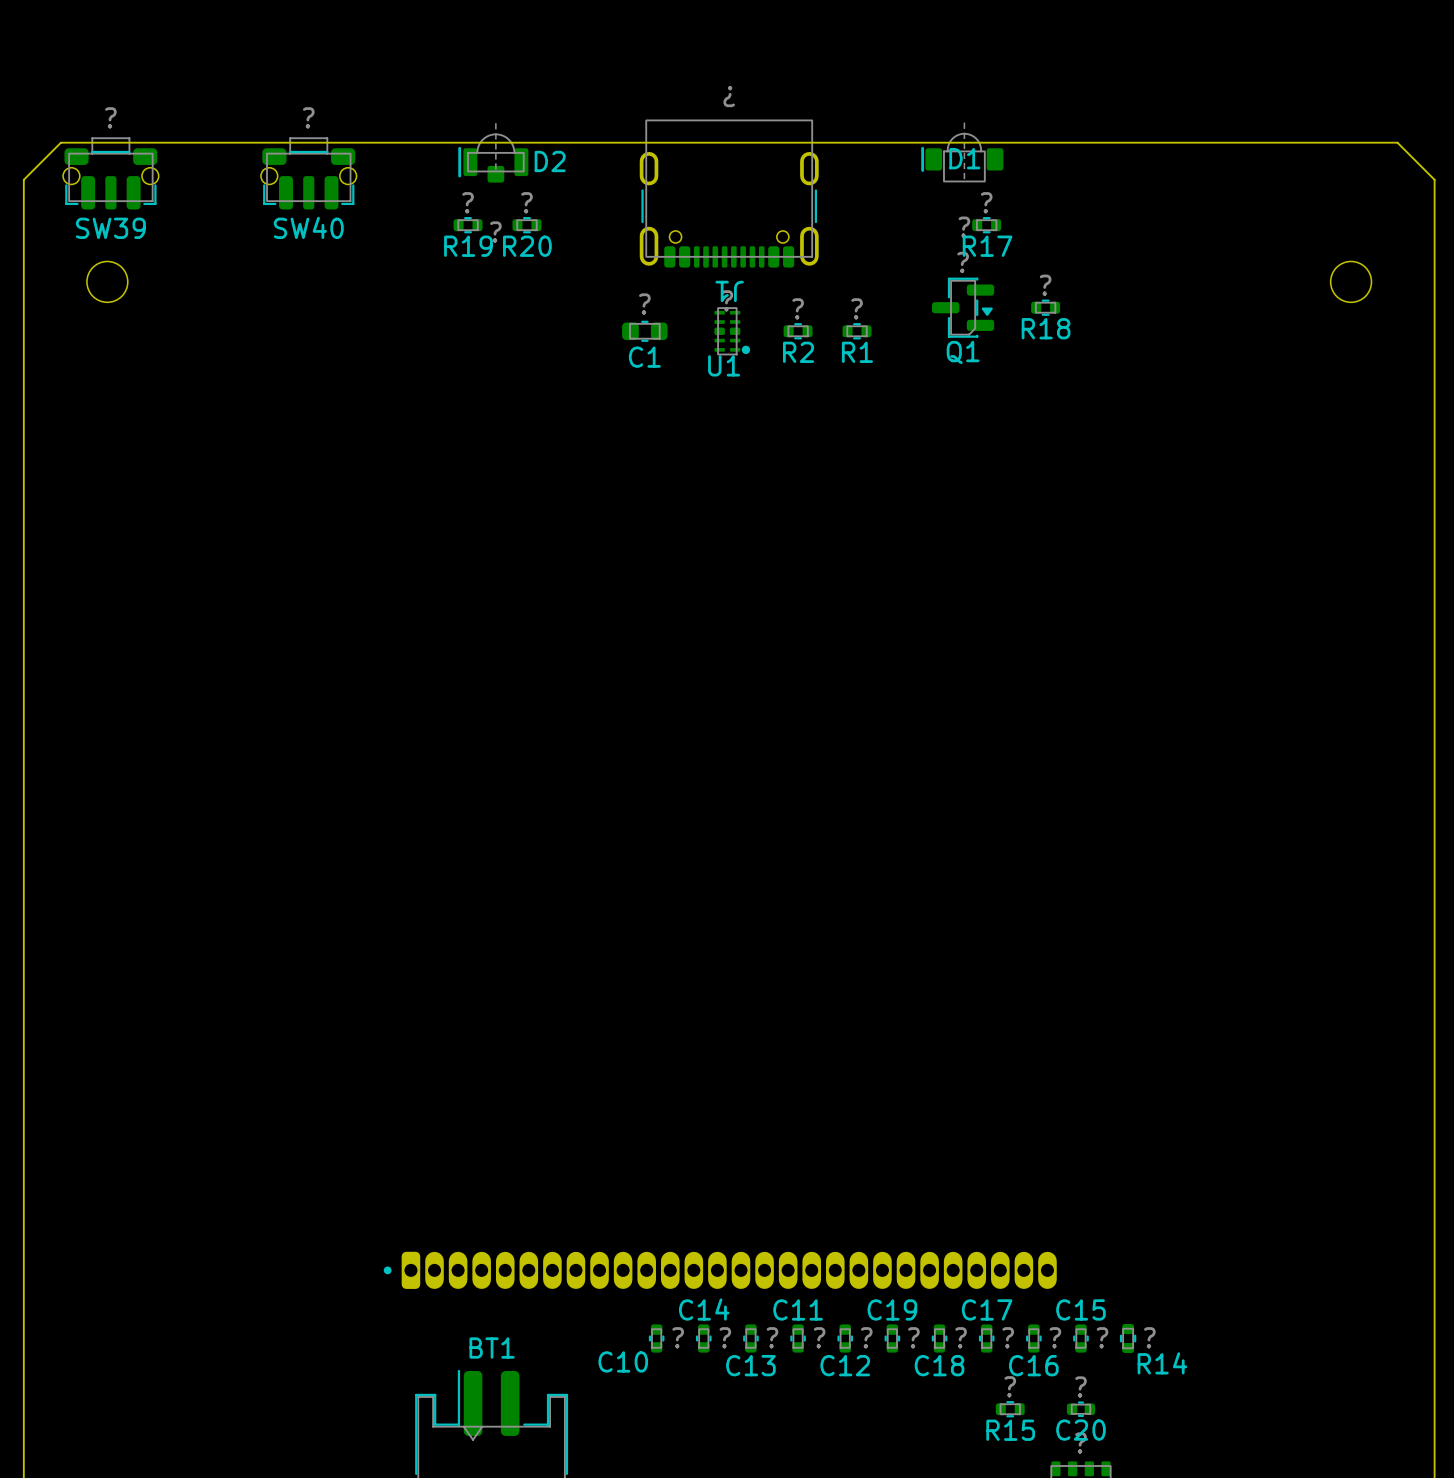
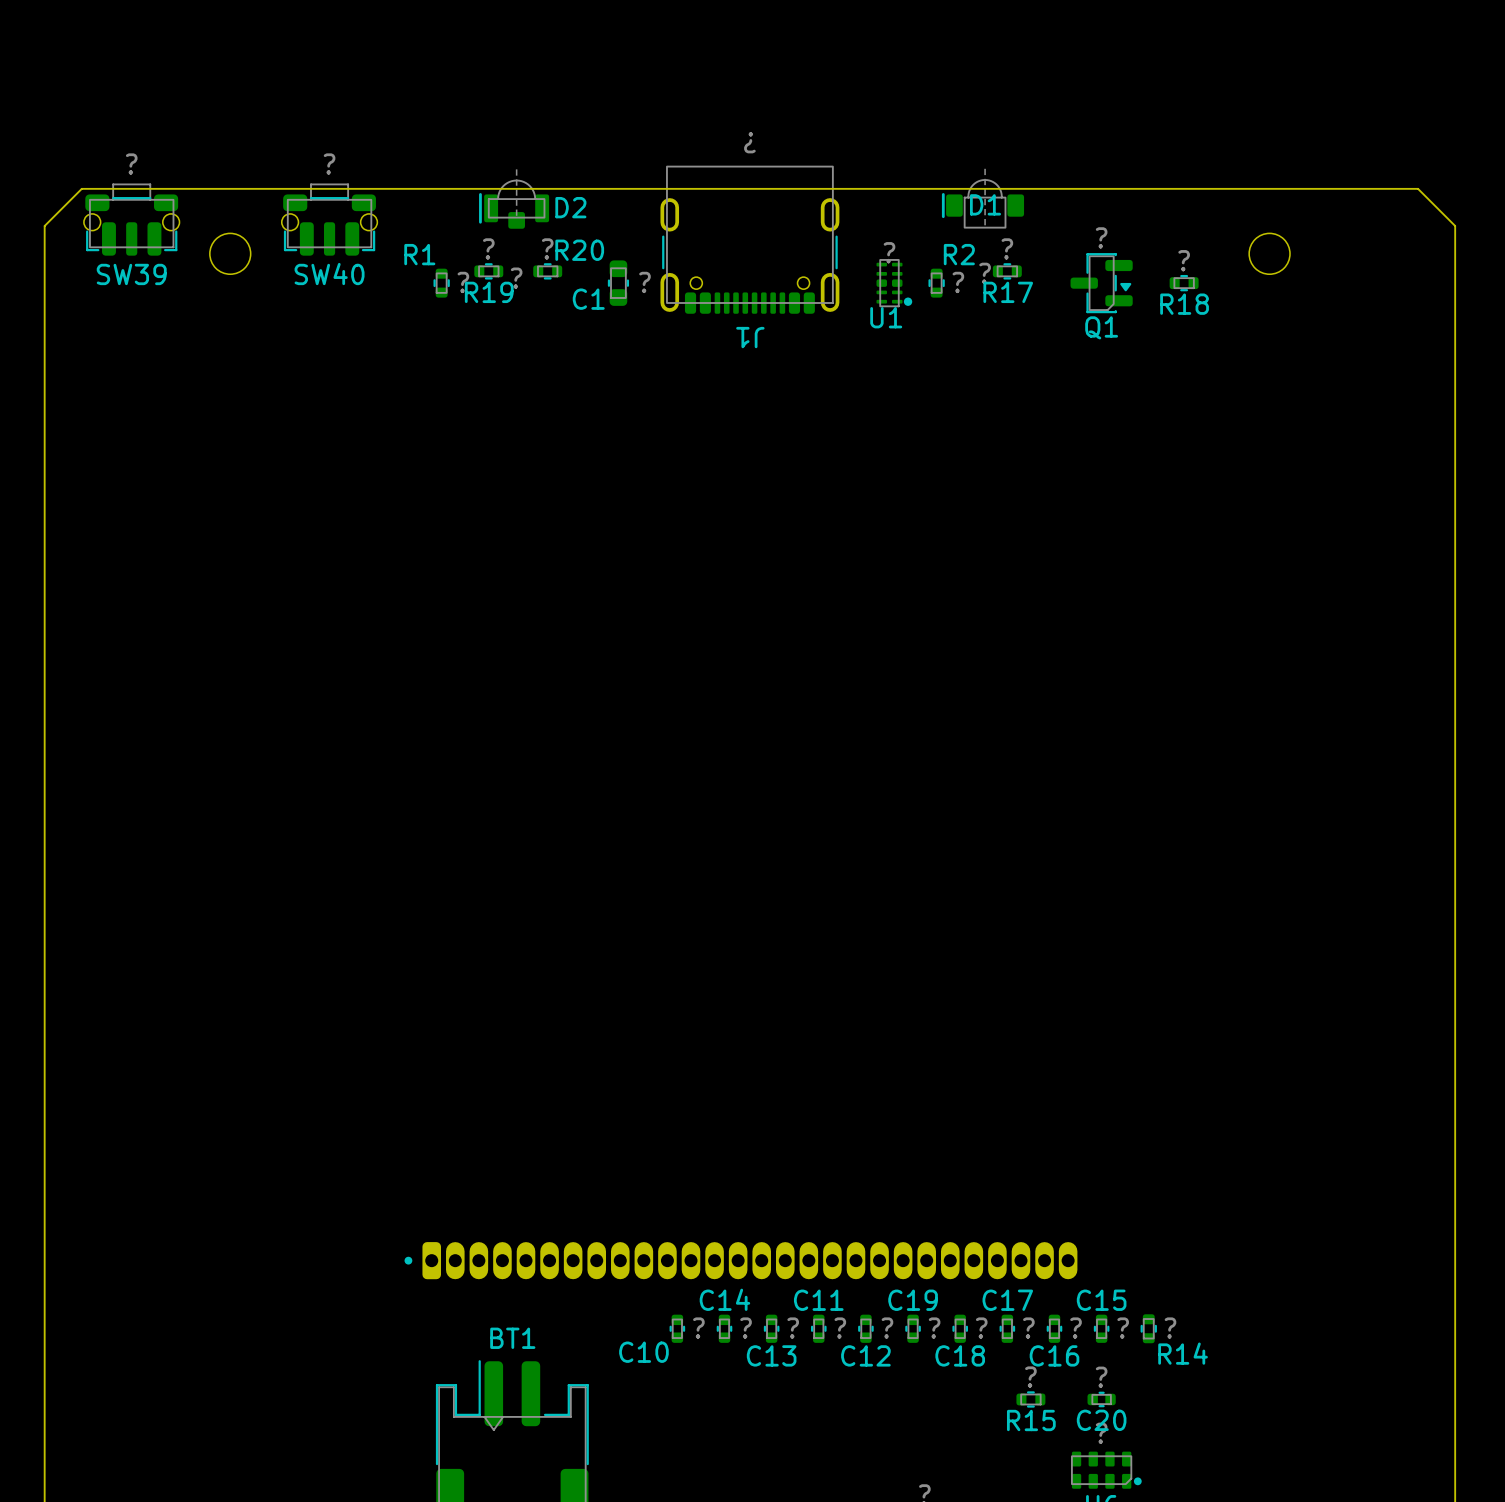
D2 position: (493, 152) -> (514, 198)
D1 position: (962, 152) -> (982, 198)
SW39 position: (110, 173) -> (131, 219)
SW40 position: (308, 173) -> (329, 219)
J1 position: (729, 193) -> (749, 239)
R19 position: (468, 225) -> (488, 271)
R20 position: (526, 225) -> (547, 271)
R17 position: (986, 225) -> (1007, 271)
board edge: (1434, 235) (1434, 179) (1397, 142) (60, 142) (23, 179) (23, 235) -> (1455, 225) (1418, 188) (81, 188) (44, 225)
R20 name position: R20 (527, 246) -> R20 (579, 250)
round board edge position: (107, 281) -> (230, 253)
round board edge position: (1351, 281) -> (1269, 253)
Q1 position: (963, 307) -> (1101, 283)
R18 position: (1045, 307) -> (1184, 283)
C1 rotation: 0° (644, 331) -> 90° clockwise (618, 283)
C1 position: (644, 331) -> (618, 283)
U1 position: (732, 331) -> (894, 283)
R2 rotation: 0° (798, 331) -> 90° clockwise (936, 283)
R2 position: (798, 331) -> (936, 283)
R1 rotation: 0° (857, 331) -> 90° clockwise (441, 283)
R1 position: (857, 331) -> (441, 283)
R2 name position: R2 (798, 352) -> R2 (959, 254)

